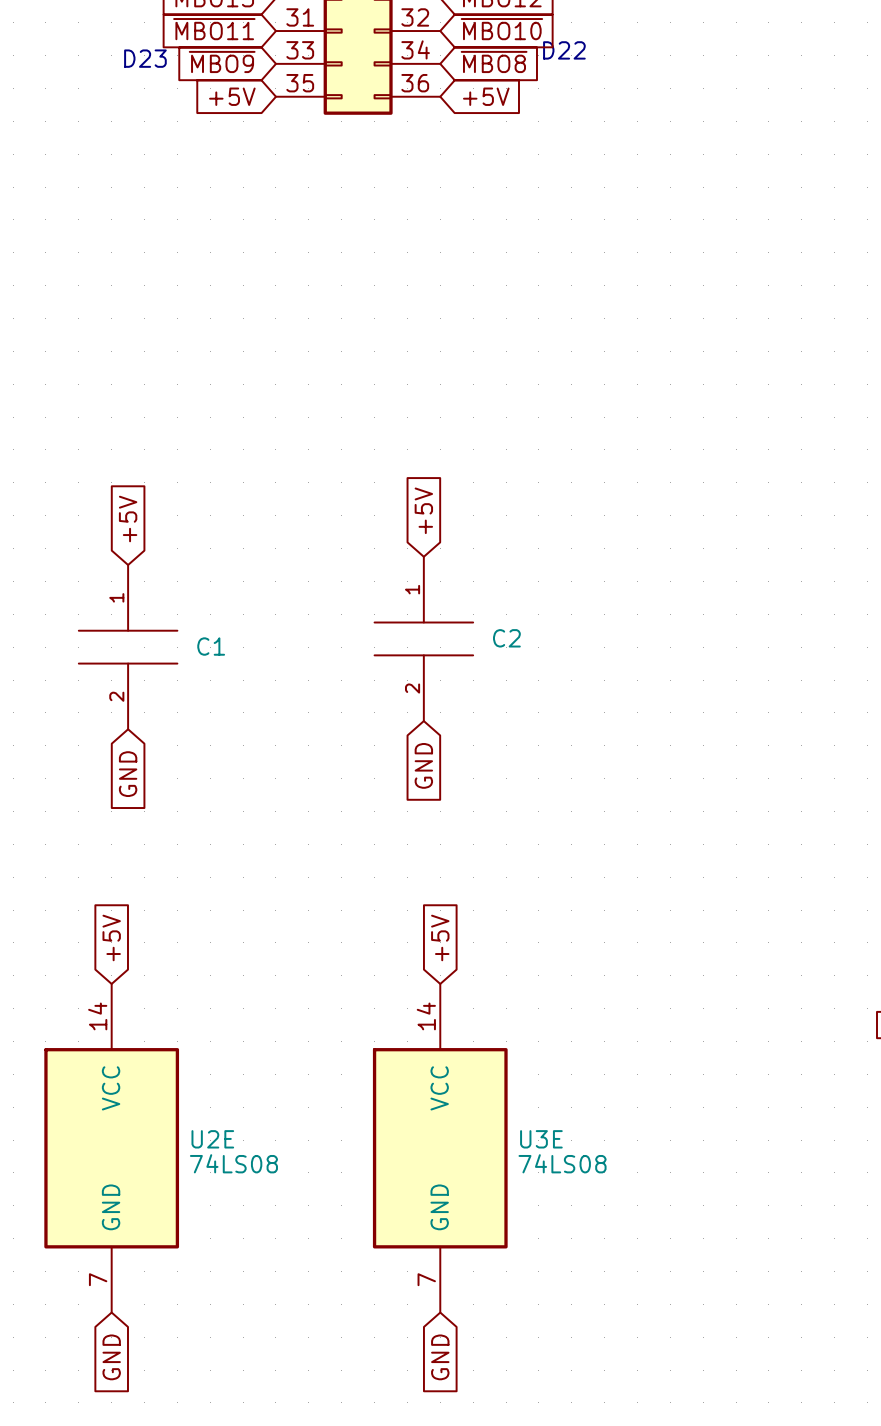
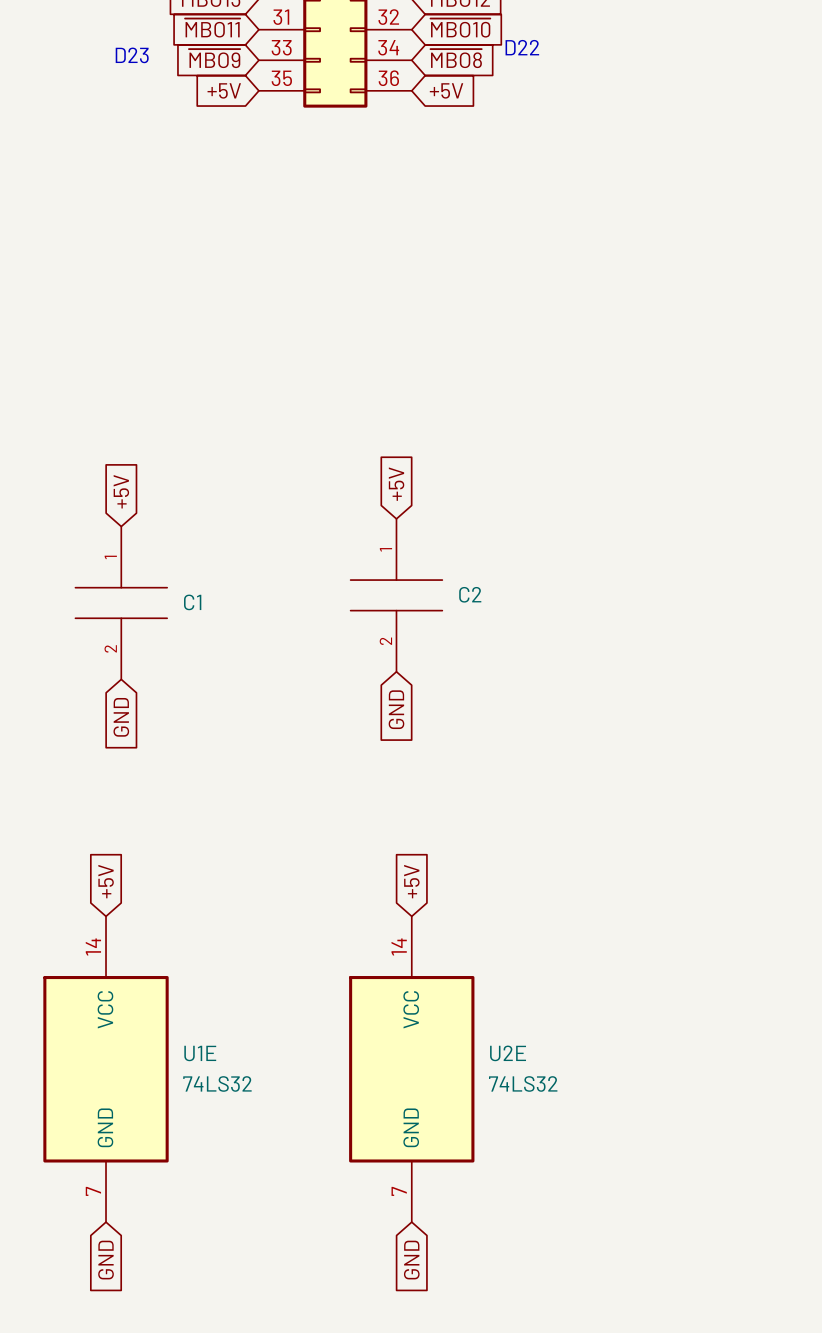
U2E name: U2E (212, 1139) -> U1E (200, 1053)
U3E name: U3E (541, 1139) -> U2E (508, 1053)
U2E value: 74LS08 (233, 1163) -> 74LS32 (217, 1083)
U3E value: 74LS08 (562, 1163) -> 74LS32 (523, 1083)

